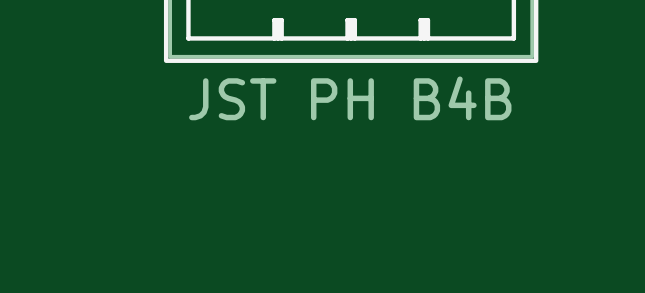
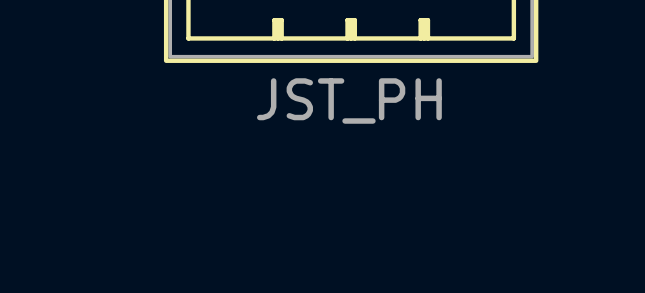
part value: JST PH B4B (350, 98) -> JST_PH (349, 100)

